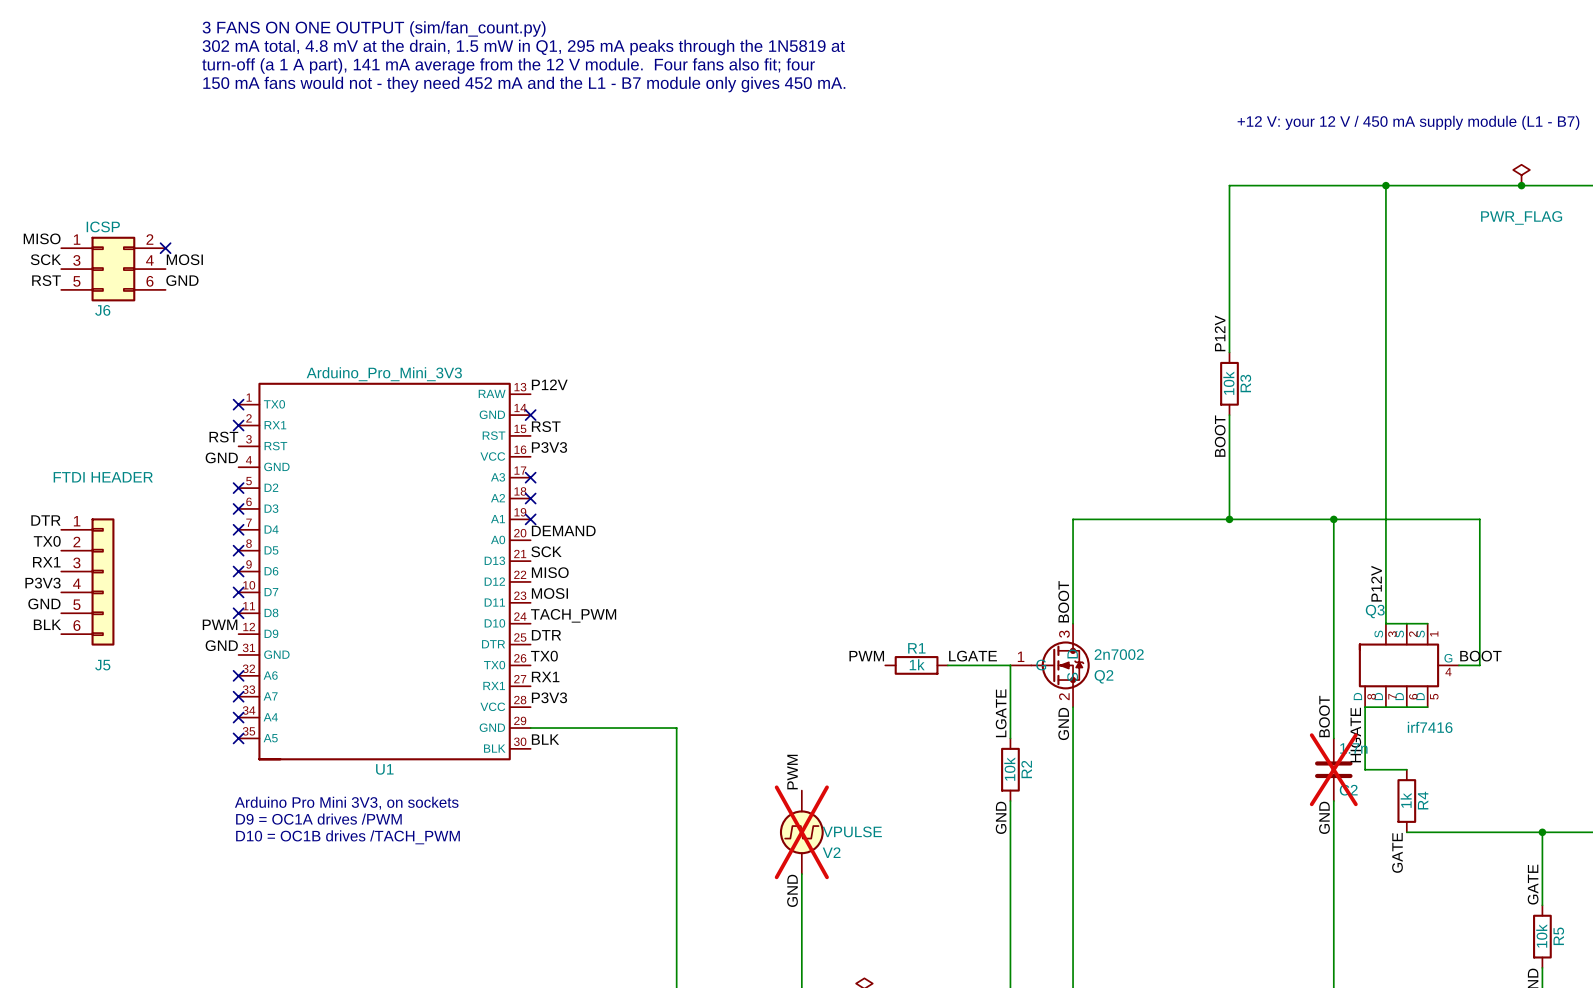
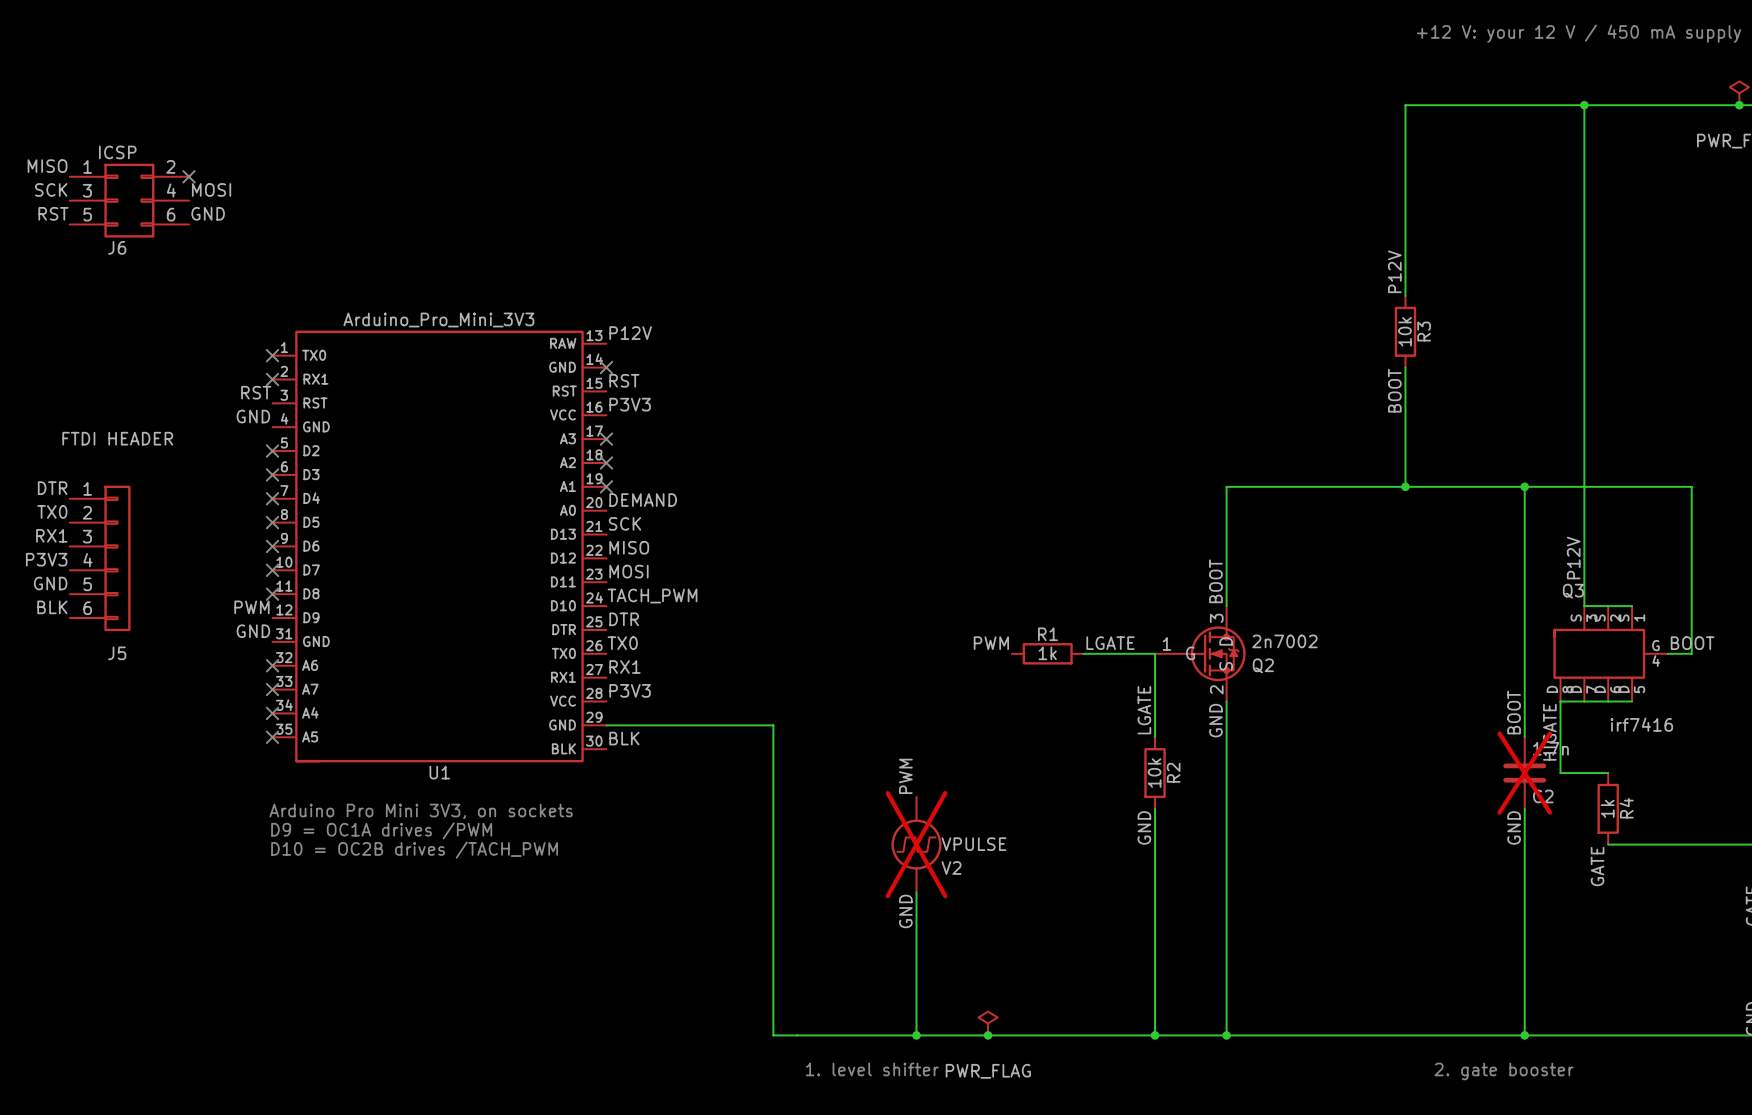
text: D10 = OC1B drives /TACH_PWM (347, 837) -> D10 = OC2B drives /TACH_PWM (414, 850)

